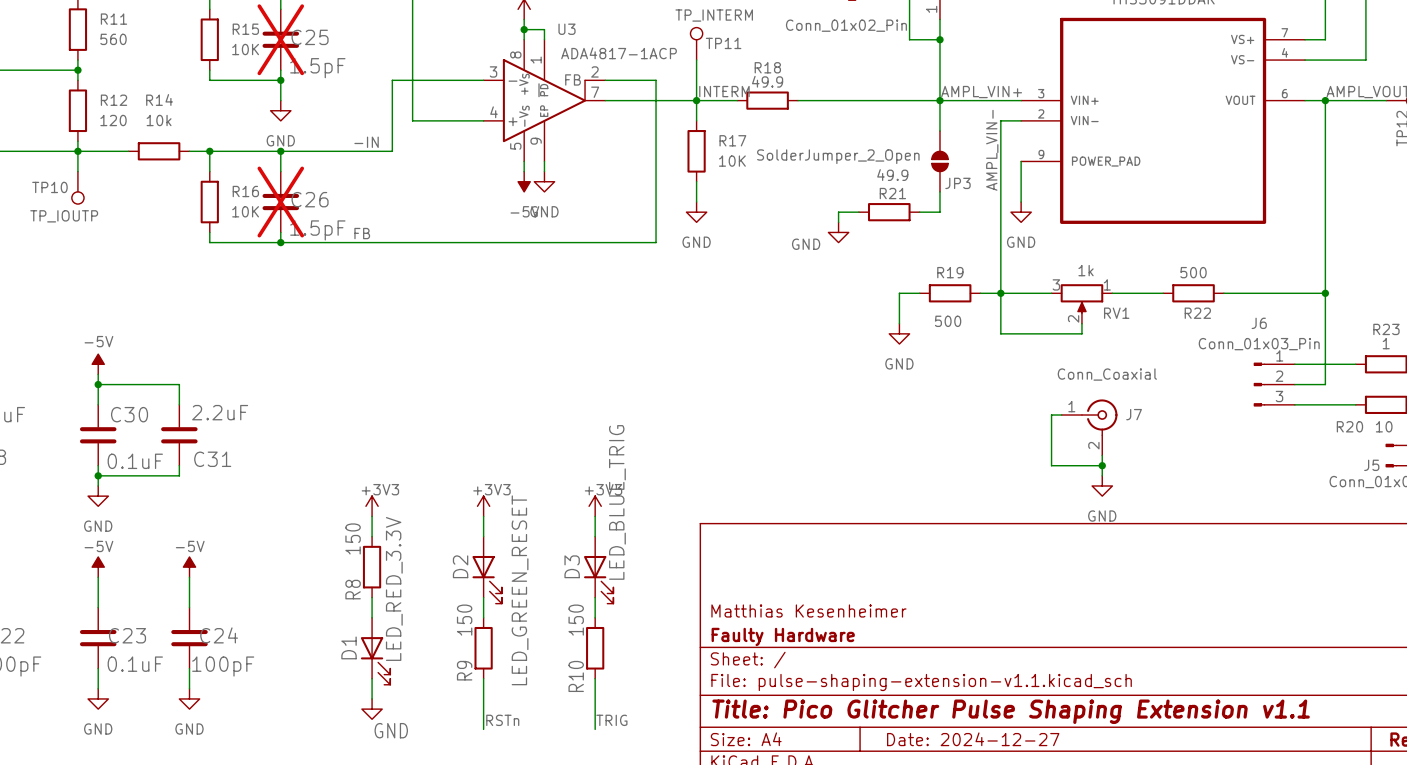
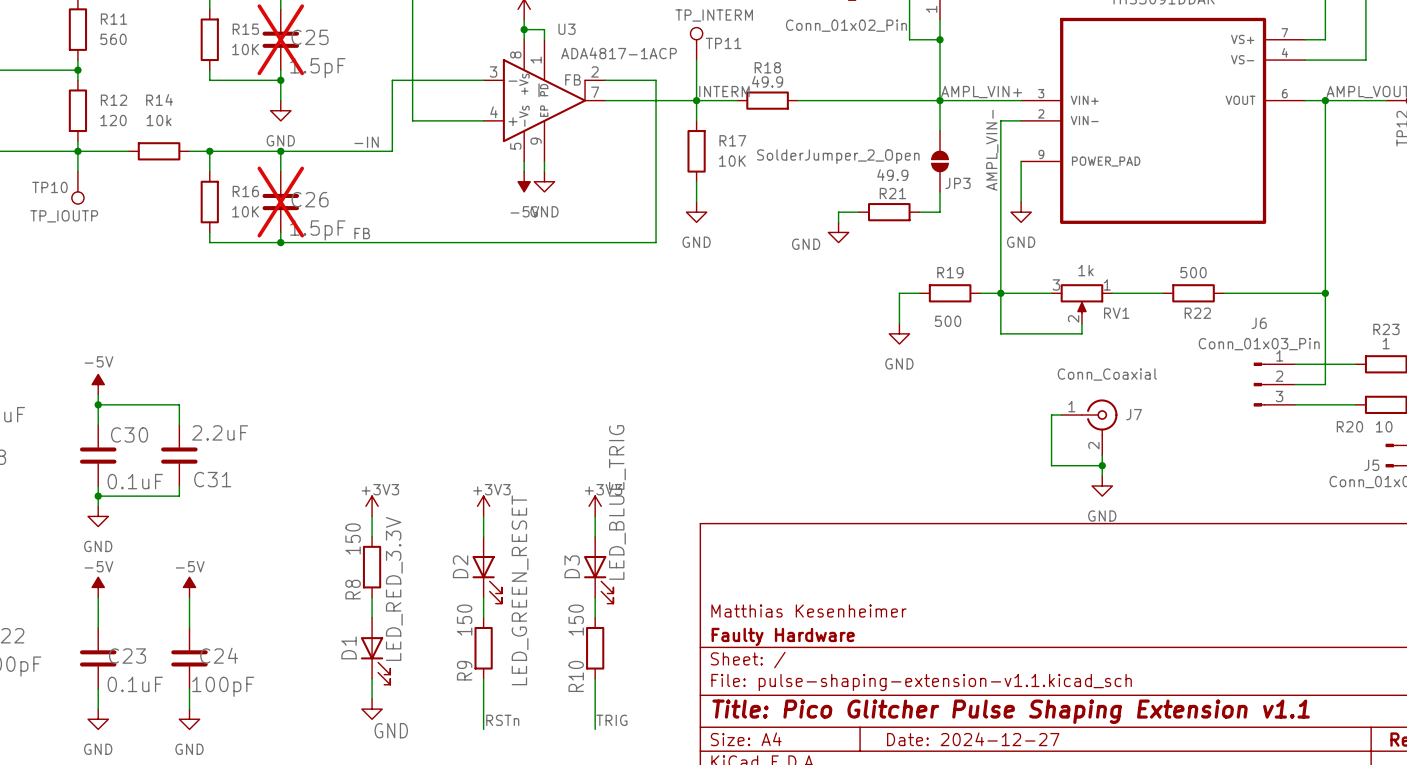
power symbol position: -5V (98, 364) -> -5V (98, 384)
wire: (98, 384) (179, 384) (179, 404) -> none
junction position: (98, 384) -> (98, 404)
wire: none -> (98, 425) (98, 404) (179, 404) (179, 425)
C30 position: (98, 435) -> (98, 455)
C31 position: (179, 435) -> (179, 455)
wire: (179, 465) (179, 475) (98, 475) -> (179, 485) (179, 496) (98, 496)
junction position: (98, 475) -> (98, 496)
power symbol position: GND (98, 496) -> GND (98, 516)
power symbol position: -5V (98, 567) -> -5V (98, 587)
power symbol position: -5V (189, 567) -> -5V (189, 587)
C23 position: (98, 638) -> (98, 658)
C24 position: (189, 638) -> (189, 658)
power symbol position: GND (98, 698) -> GND (98, 719)
power symbol position: GND (189, 698) -> GND (189, 719)

